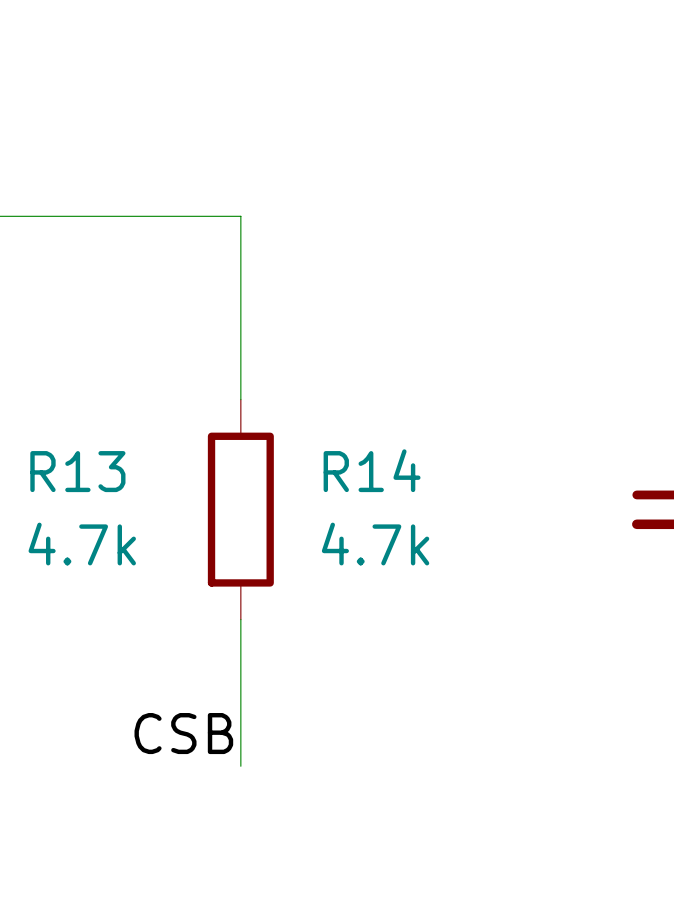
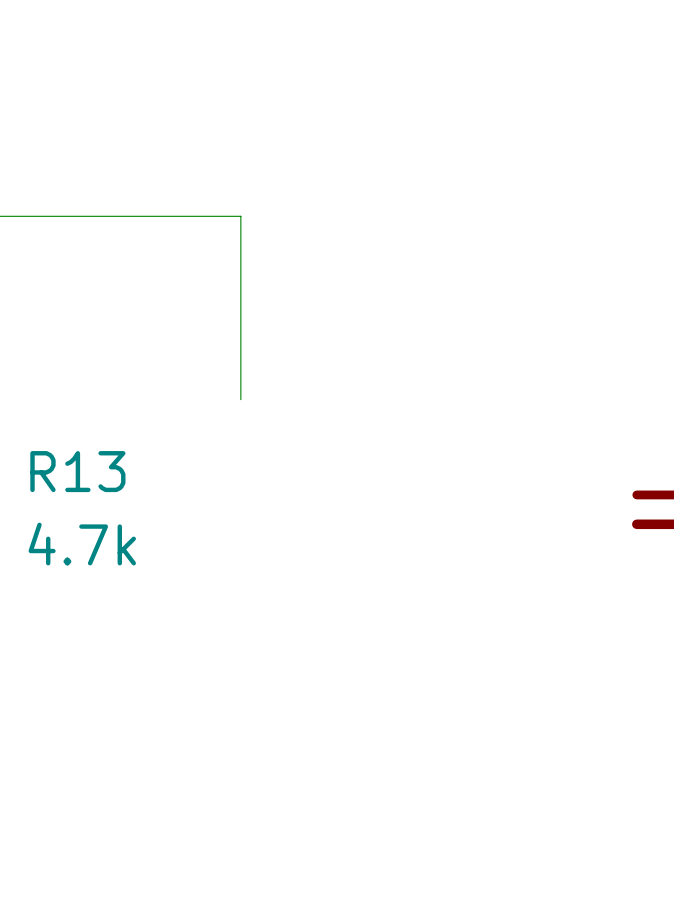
R14: 4.7k (240, 509) -> none
wire: (240, 619) (240, 766) -> none
label: CSB (183, 733) -> none

